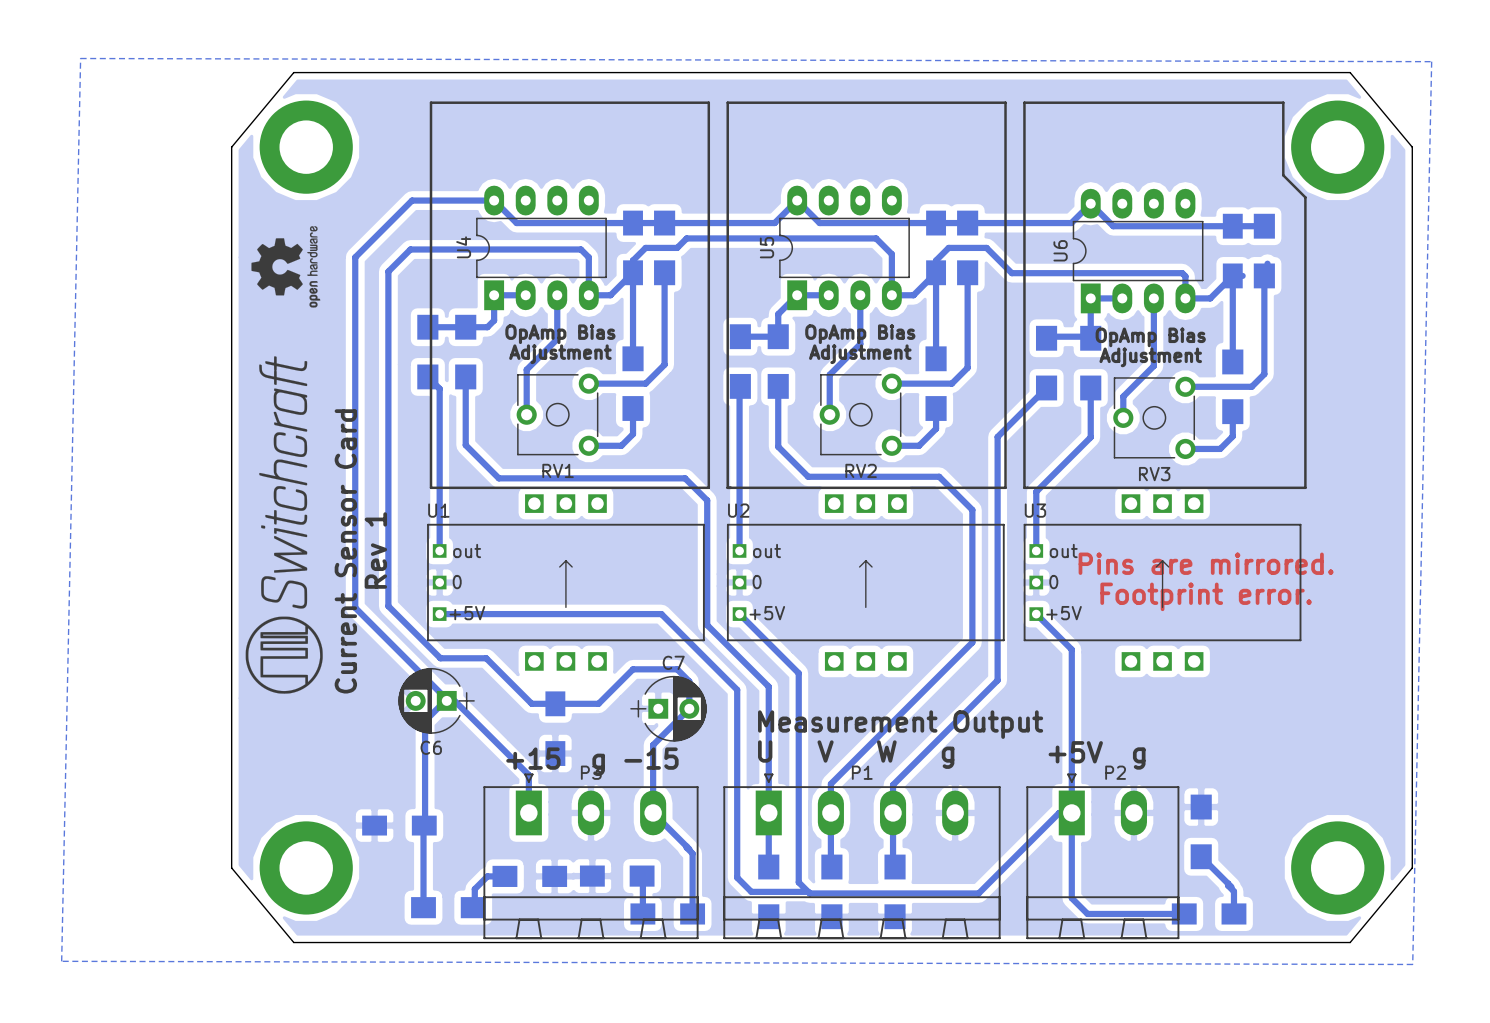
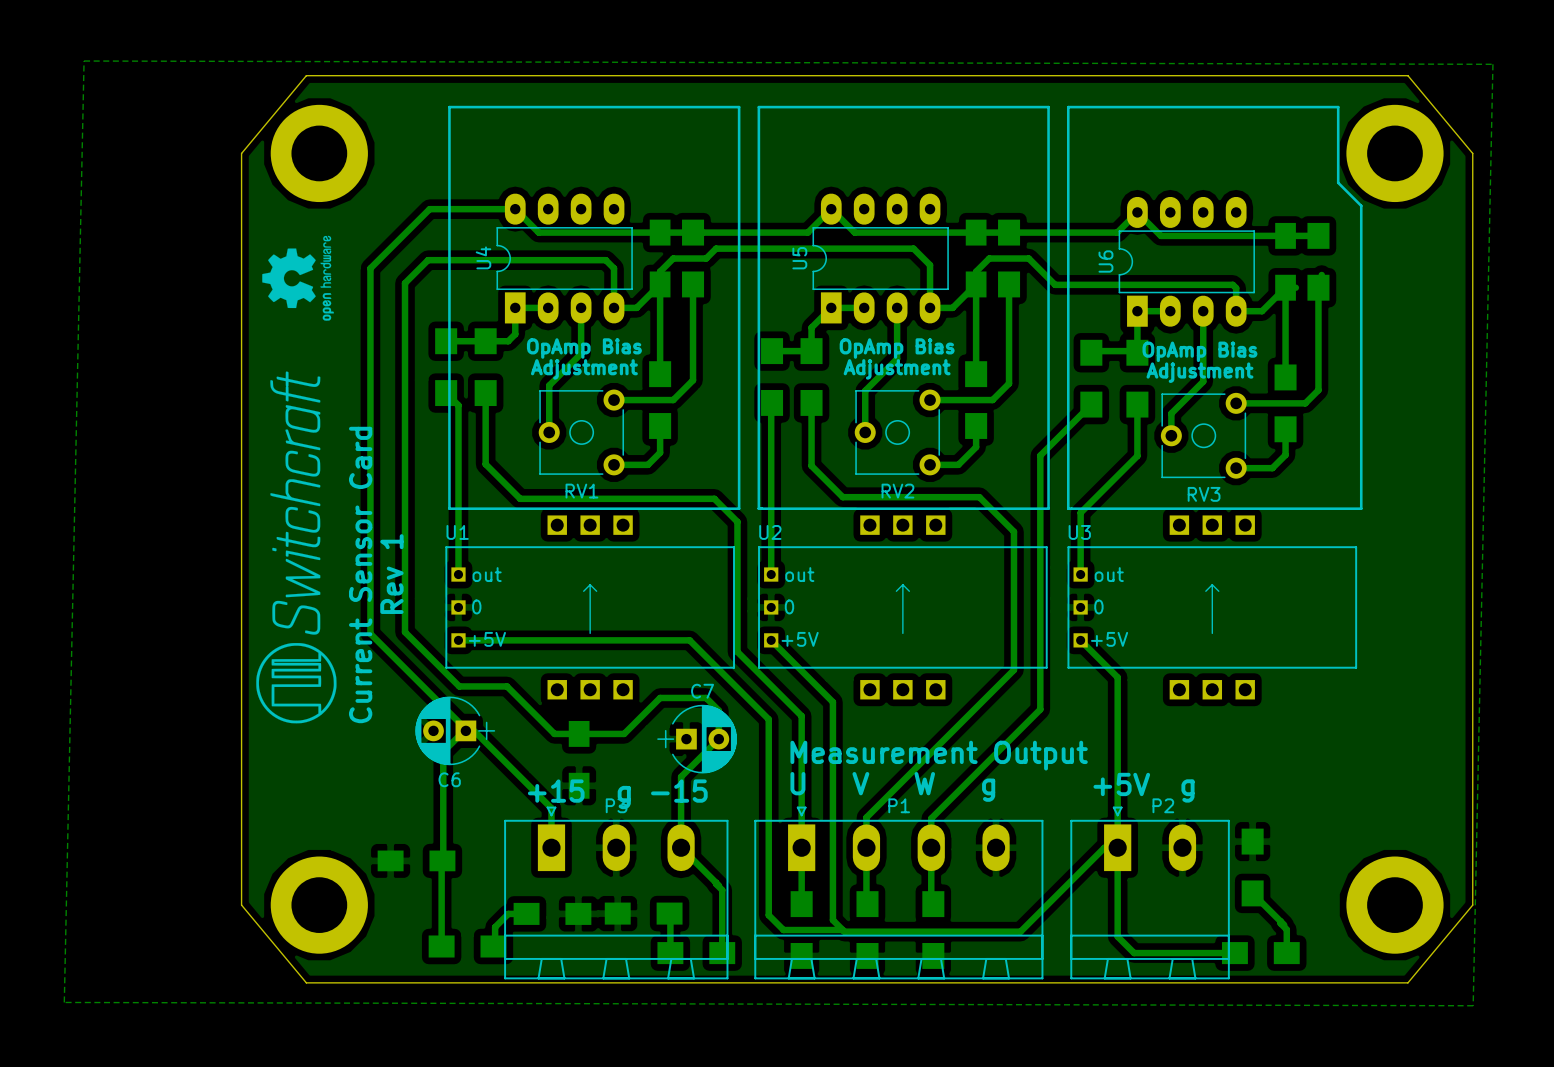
text: Pins are mirrored. (1206, 563) -> none
text: Footprint error. (1206, 596) -> none

